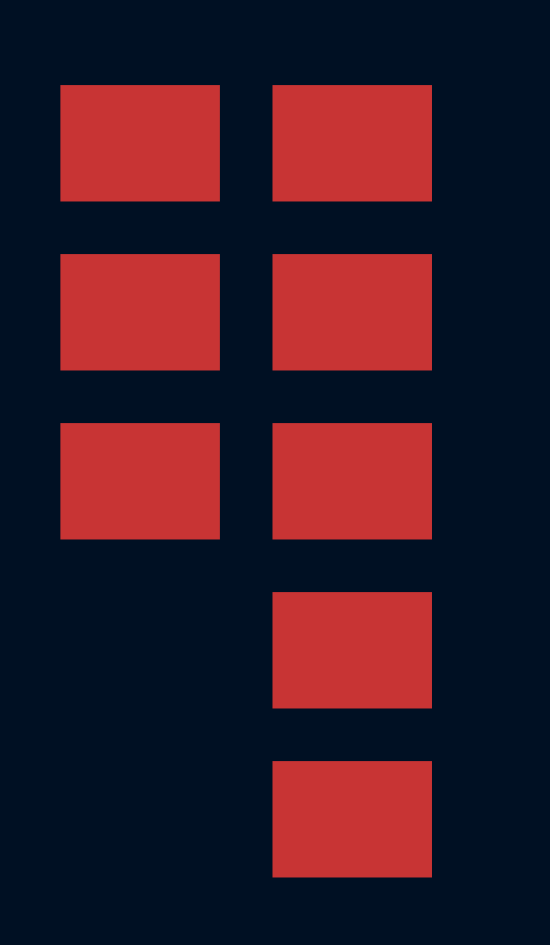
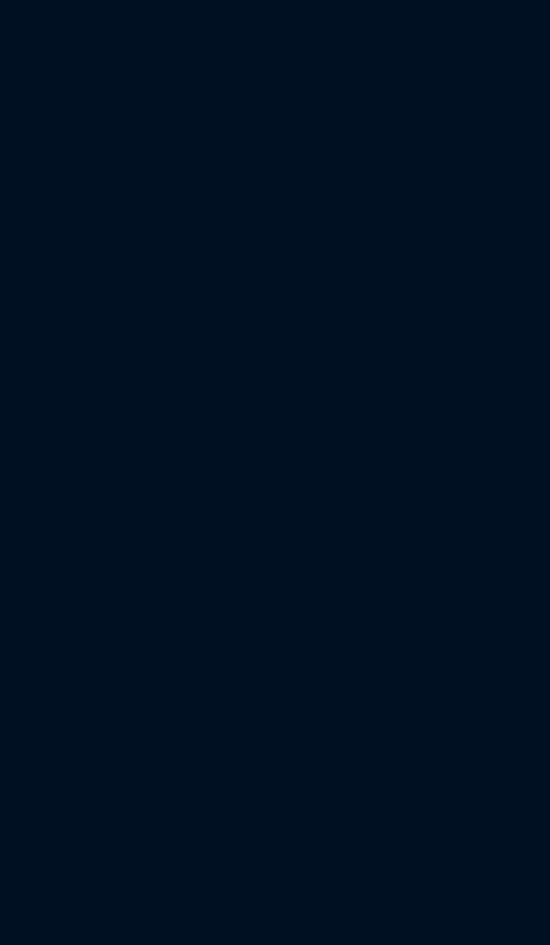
part: (140, 143) -> none
part: (352, 143) -> none
part: (140, 312) -> none
part: (352, 312) -> none
part: (140, 481) -> none
part: (352, 481) -> none
part: (352, 650) -> none
part: (352, 819) -> none

